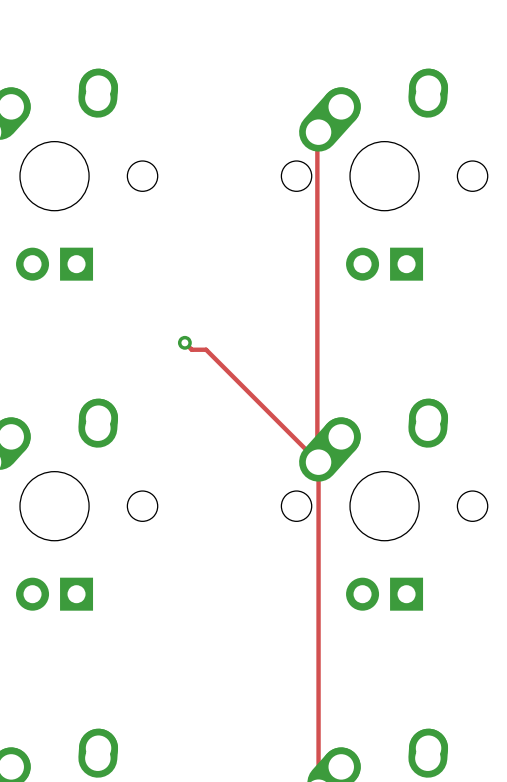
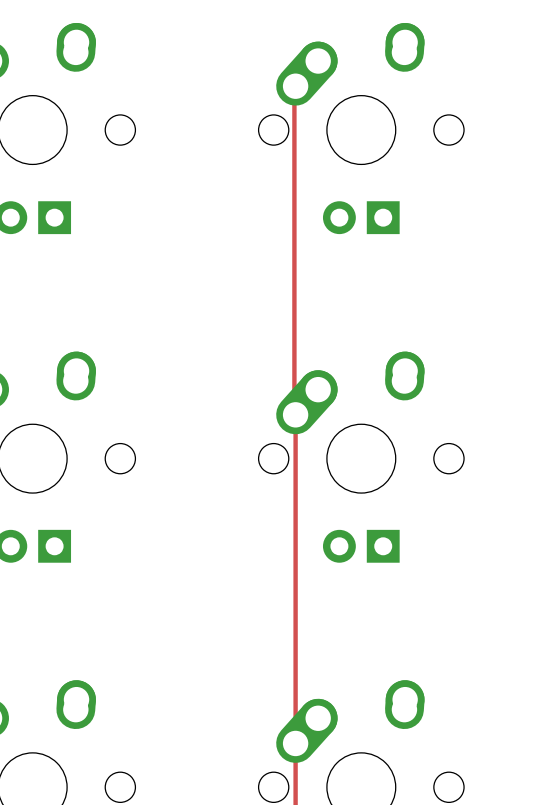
track: (184, 342) (191, 349) (206, 349) (317, 461) -> none
via: (184, 342) -> none

